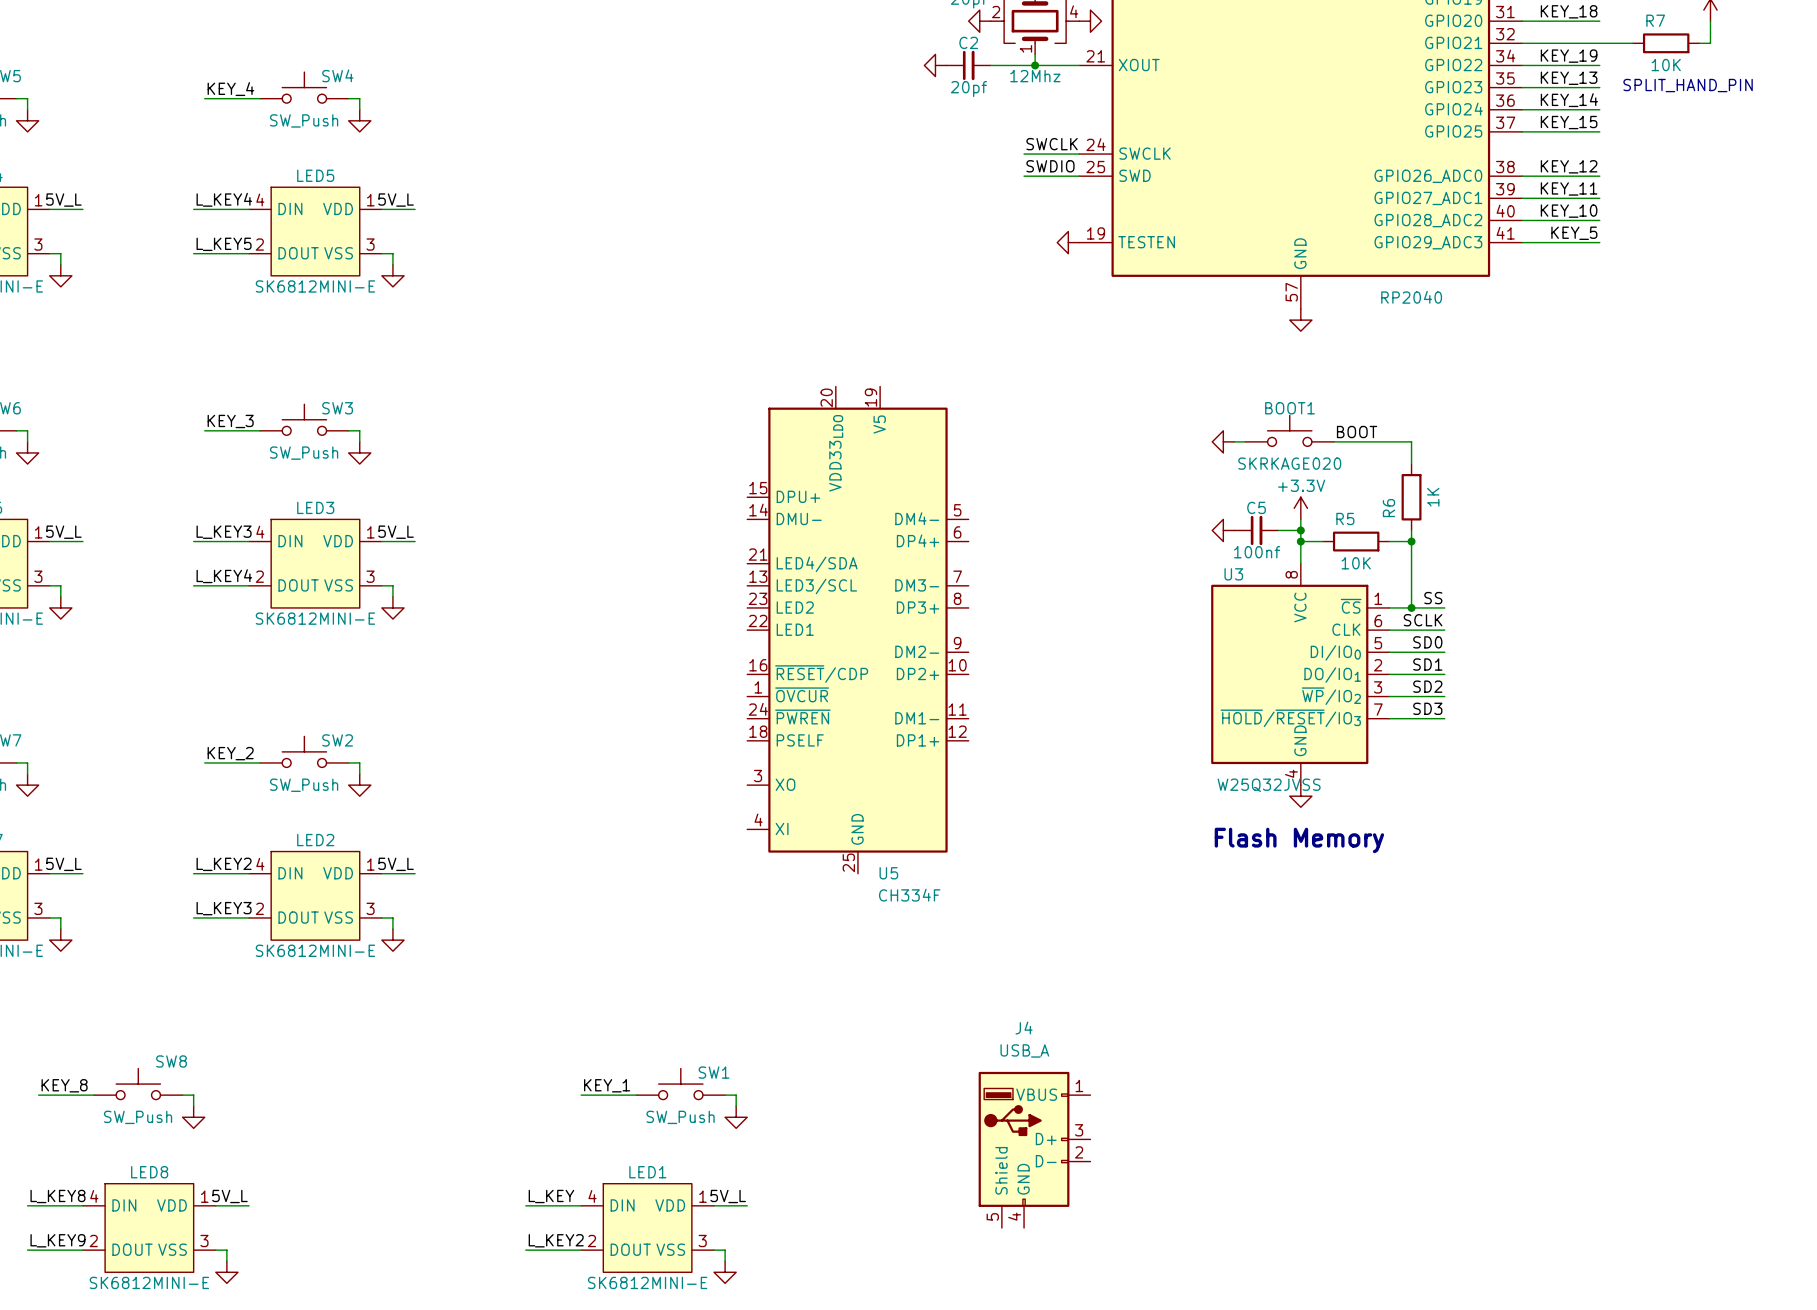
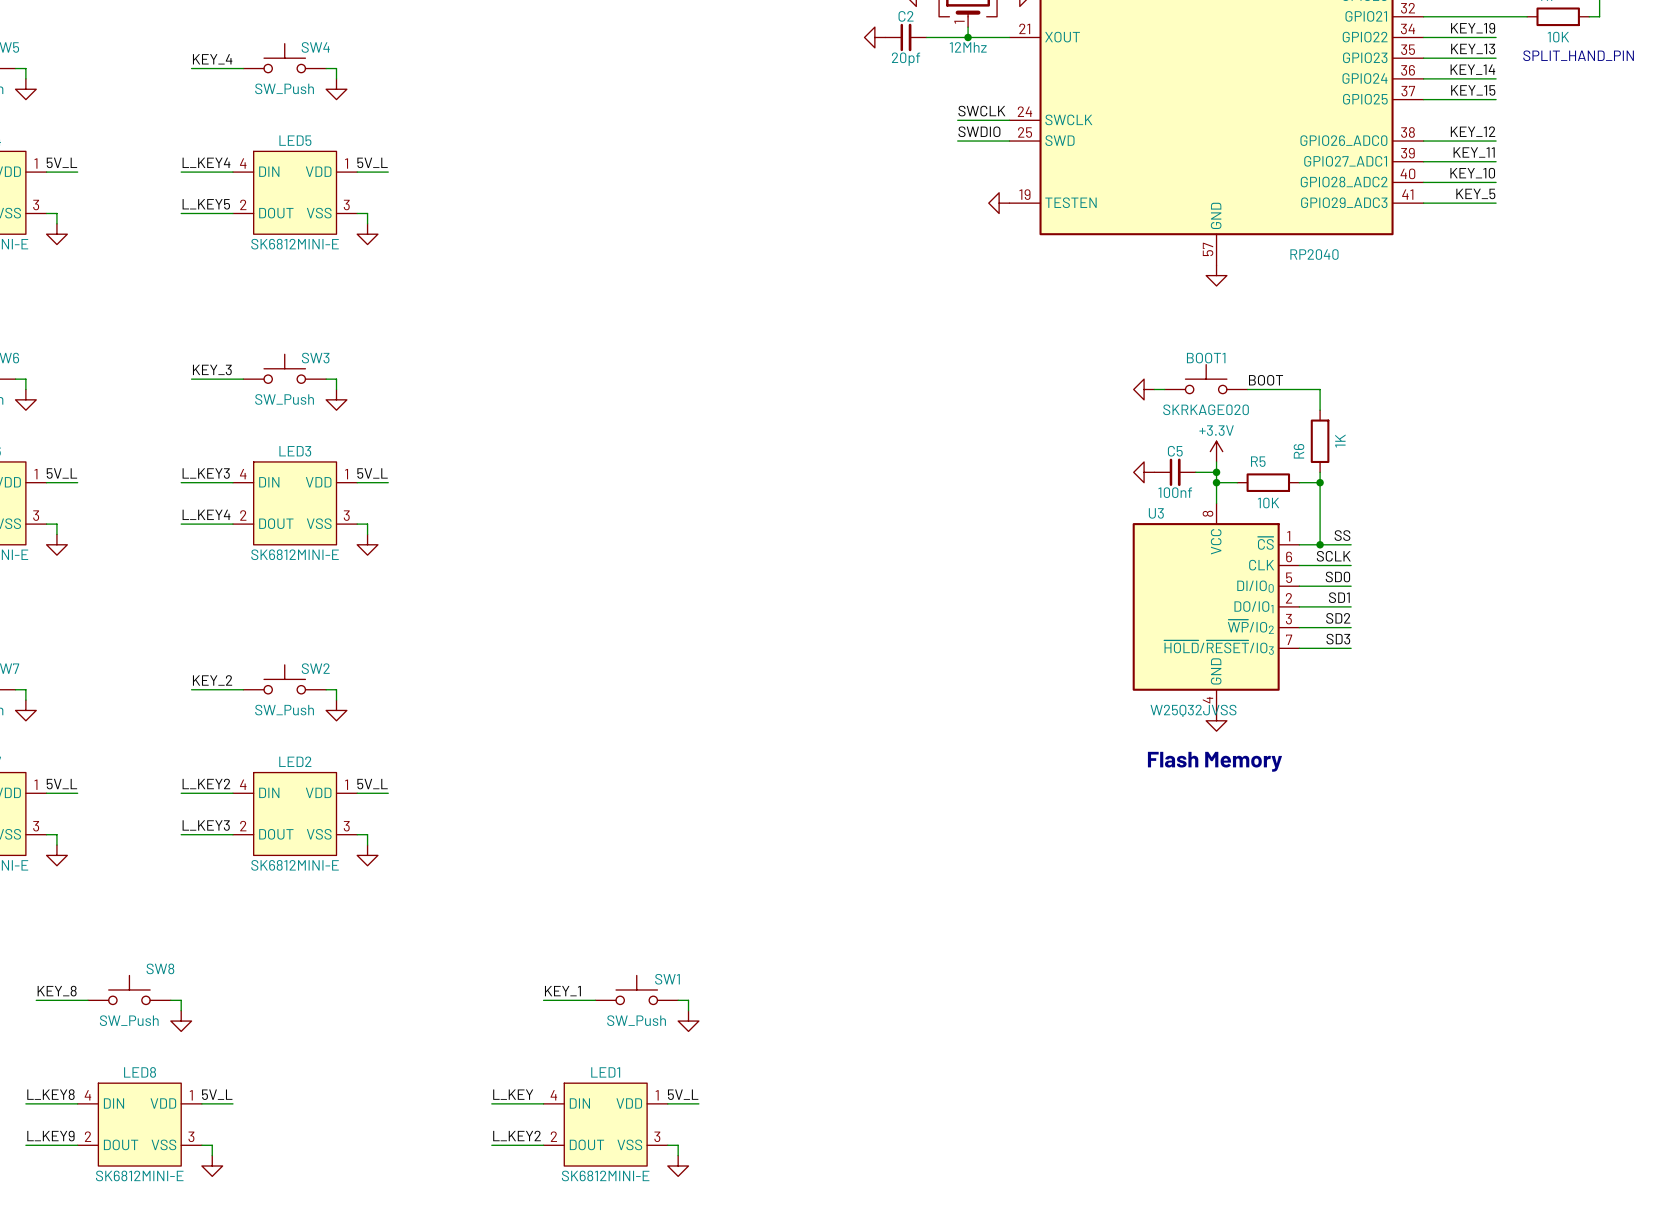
U5: CH334F (857, 630) -> none
J4: USB_A (1034, 1149) -> none

